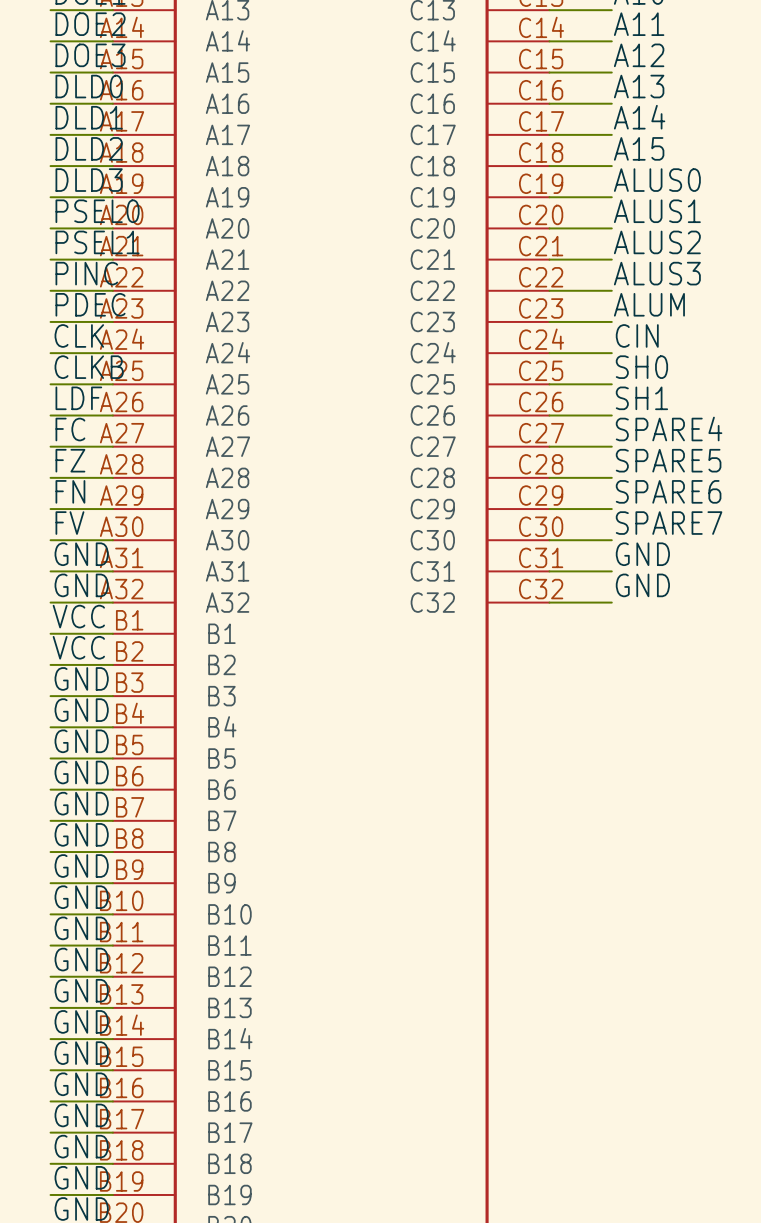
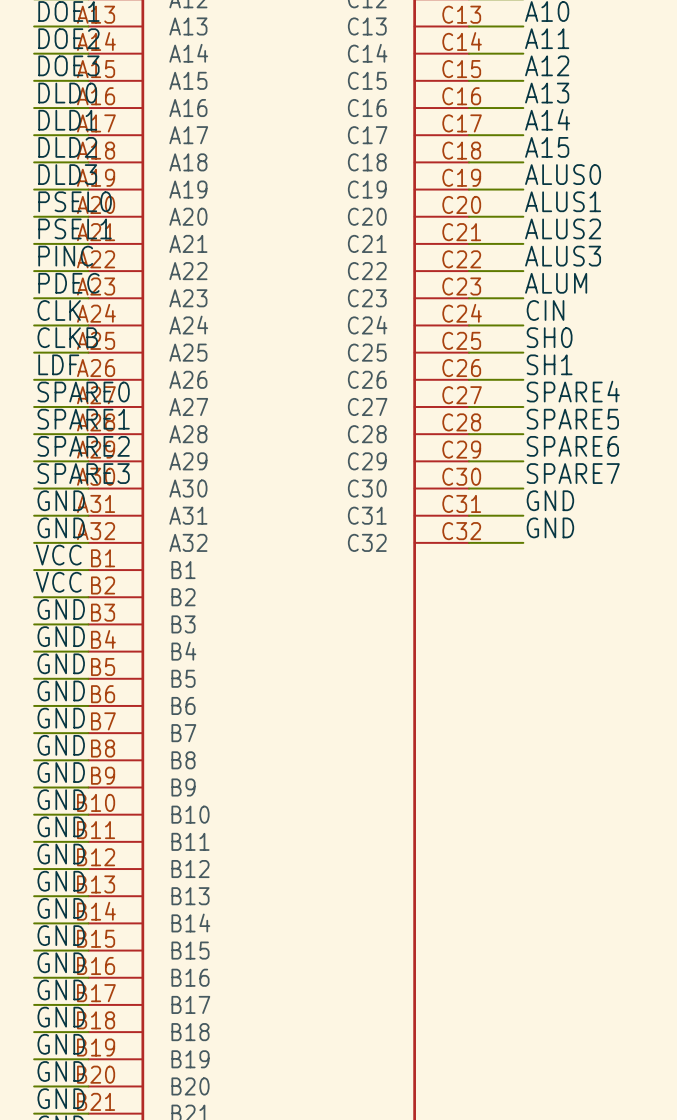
label: FC (70, 429) -> SPARE0 (83, 392)
label: FZ (70, 460) -> SPARE1 (83, 419)
label: FN (70, 491) -> SPARE2 (83, 446)
label: FV (69, 523) -> SPARE3 (83, 473)

